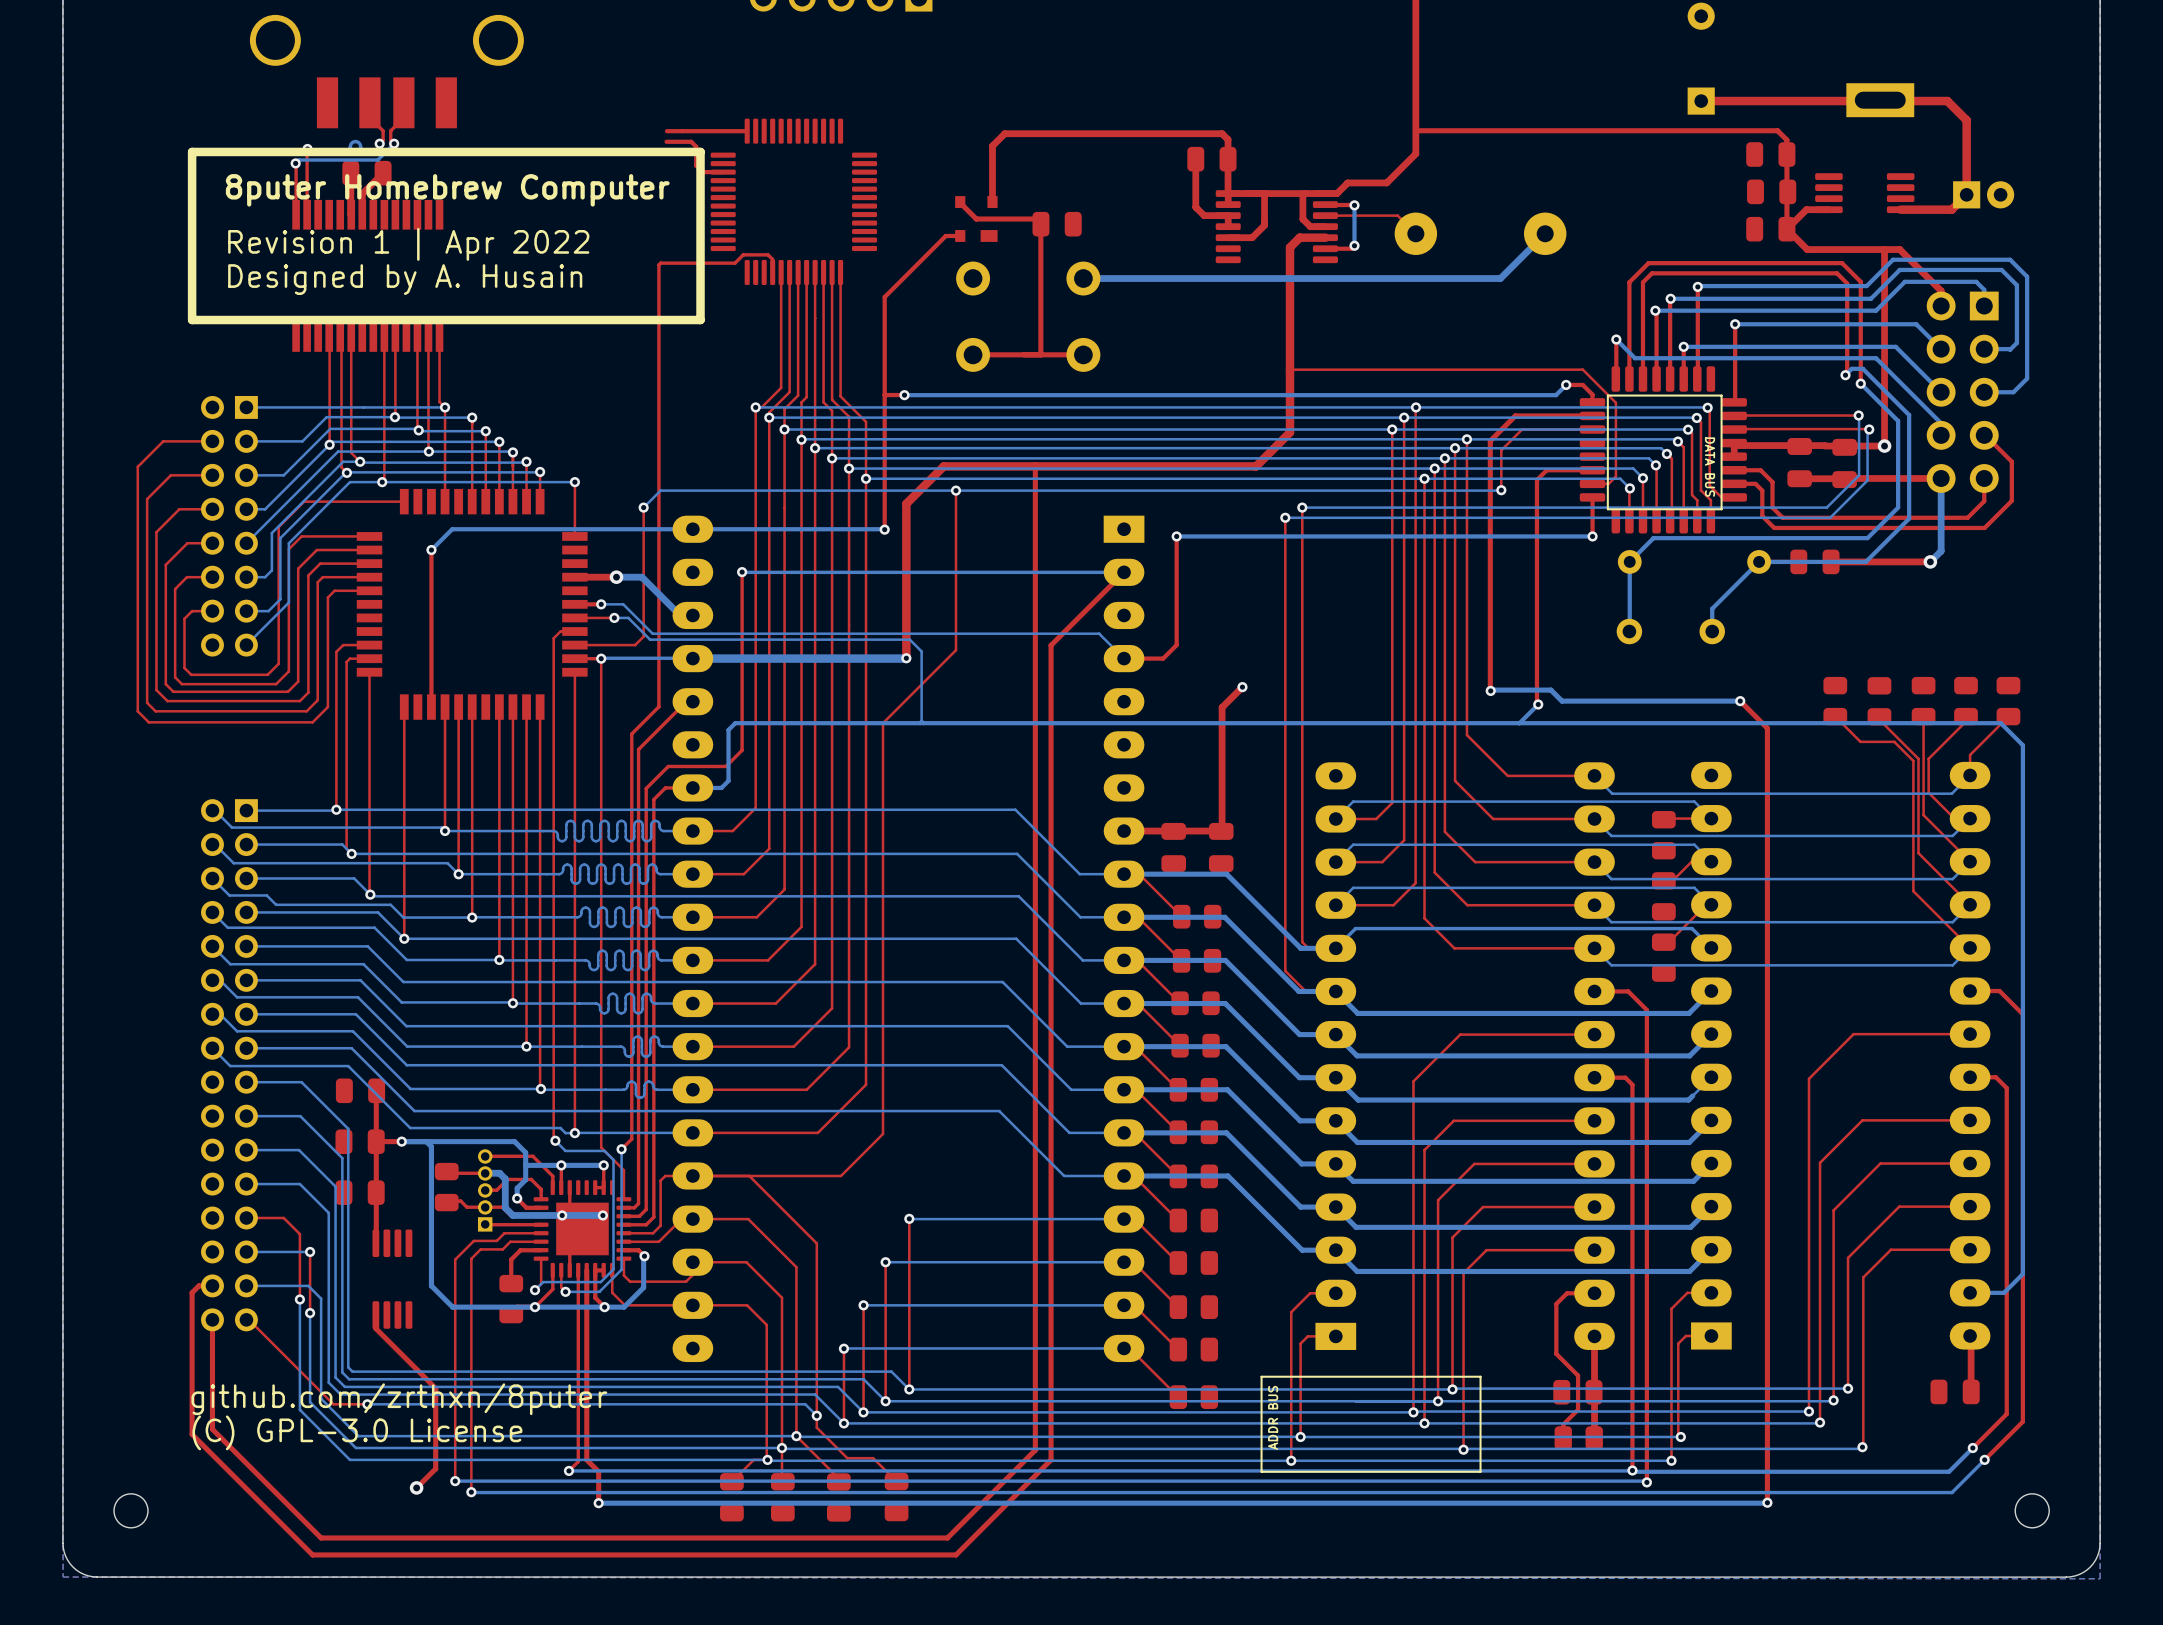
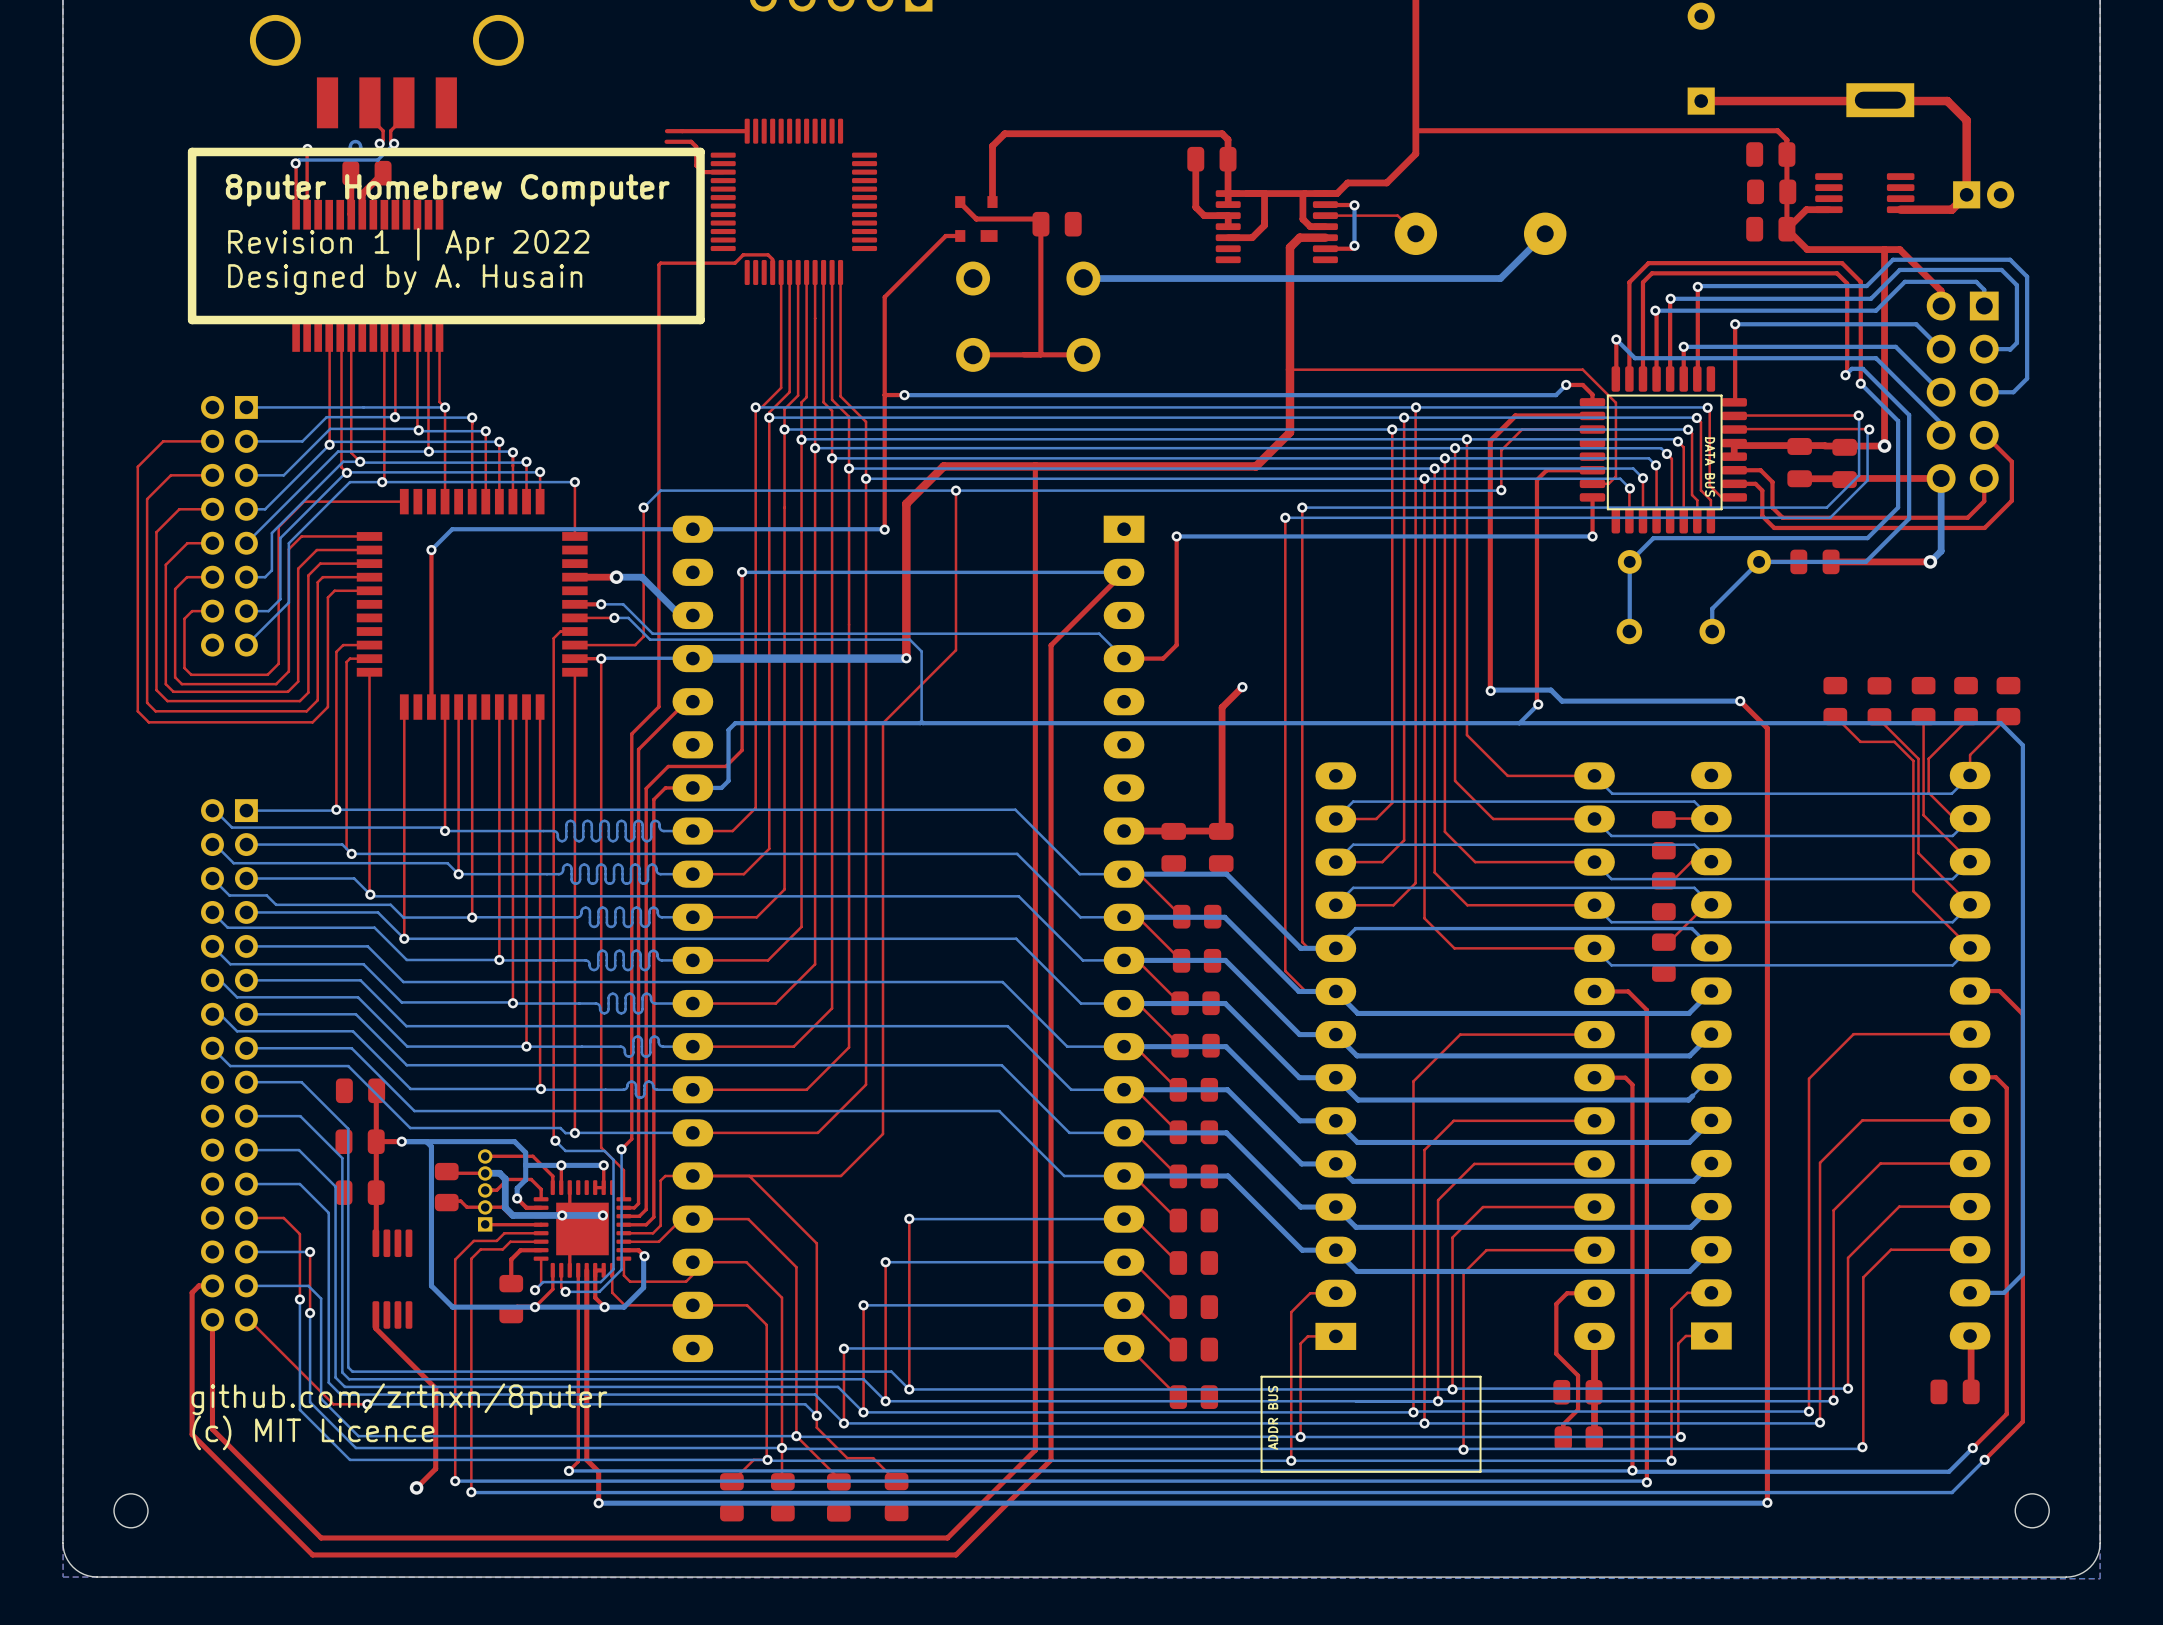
text: (C) GPL-3.0 License (357, 1432) -> (c) MIT Licence (313, 1432)

